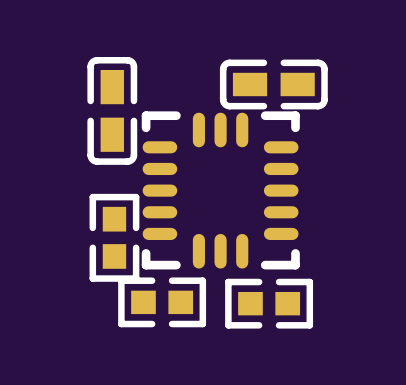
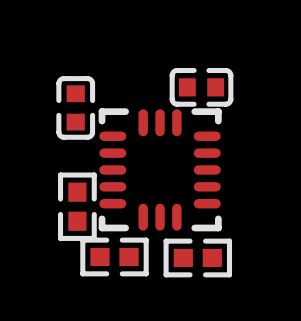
part footprint: [87, 56, 138, 165] -> [56, 76, 96, 140]
part footprint: [219, 59, 328, 110] -> [169, 67, 234, 107]

